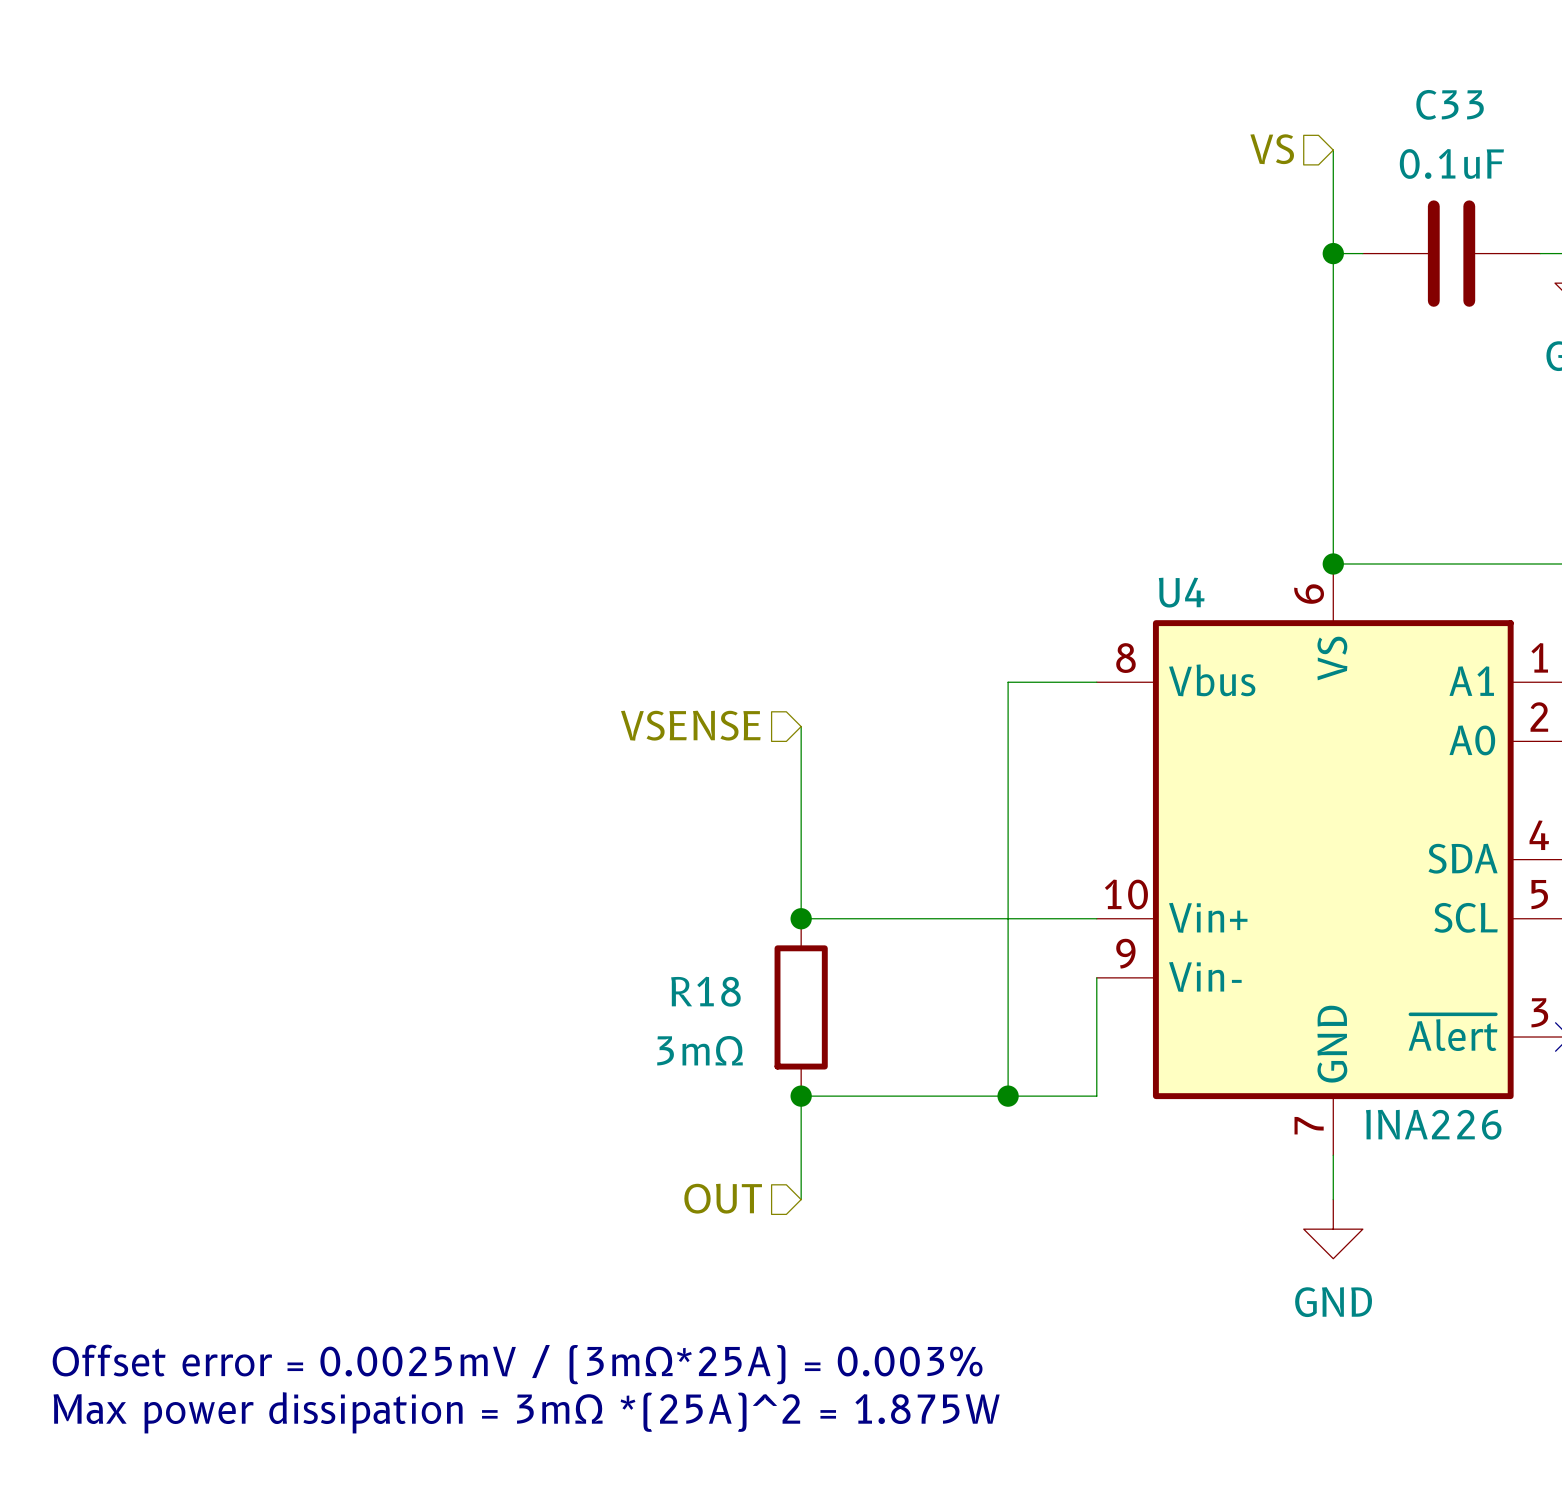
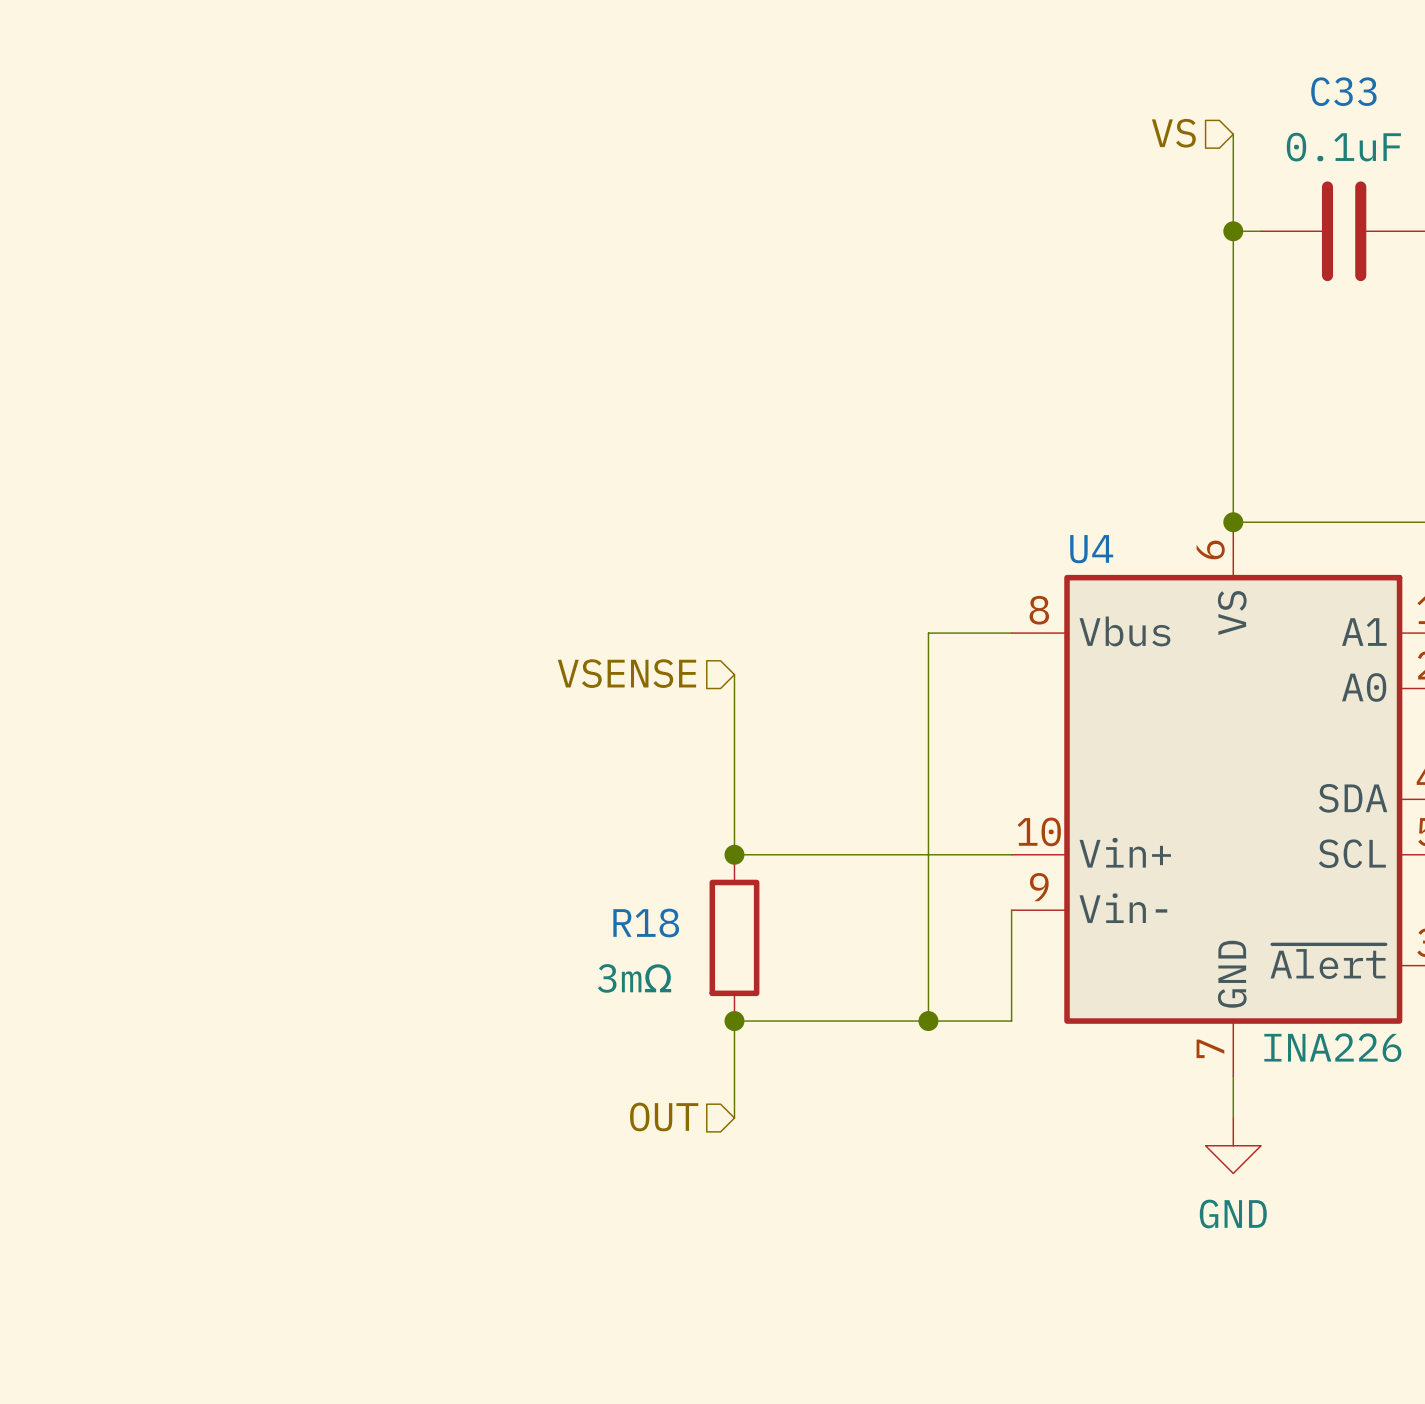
text: Offset error = 0.0025mV / (3mΩ*25A) = 0.003% (517, 1364) -> none
text: Max power dissipation = 3mΩ *(25A)^2 = 1.875W (526, 1412) -> none

